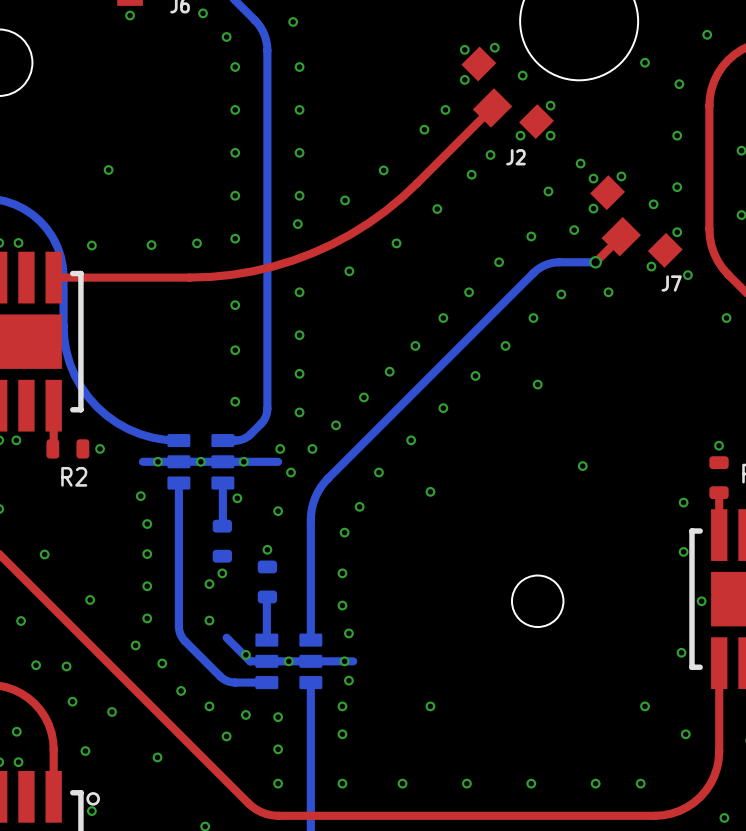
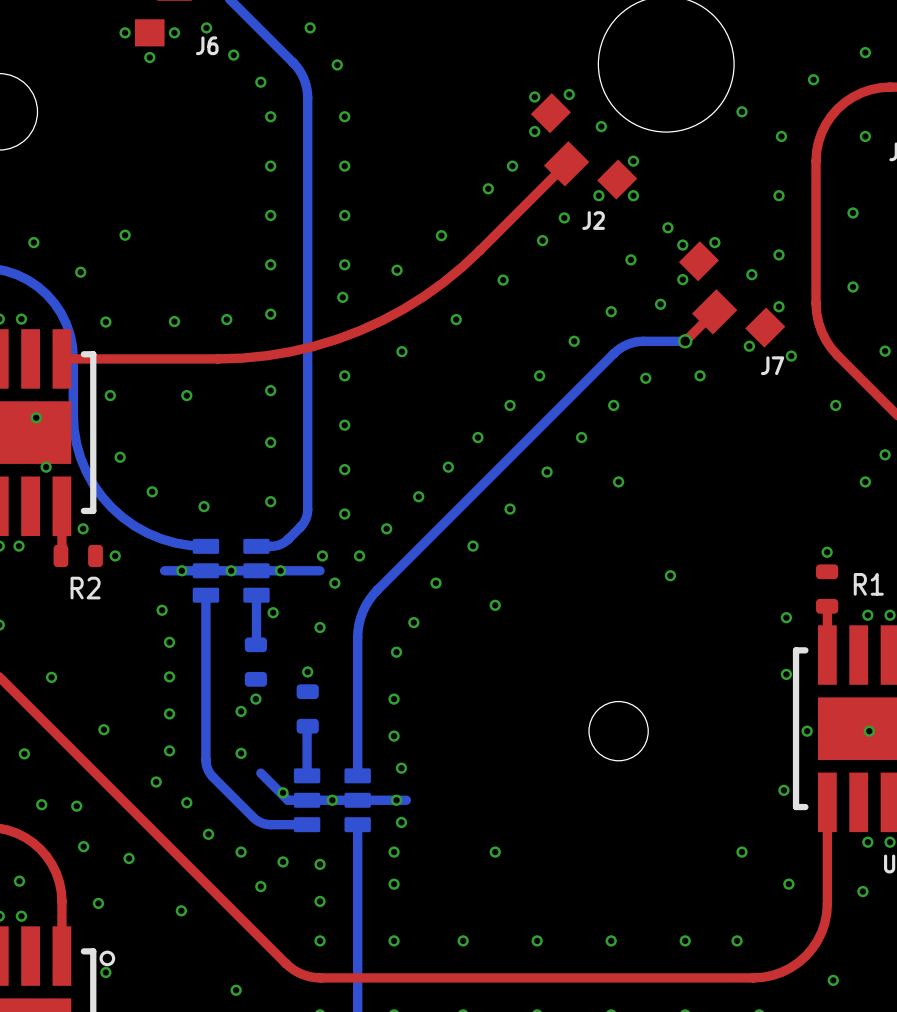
via: none -> (33, 242)
via: none -> (80, 272)
via: none -> (110, 395)
via: none -> (186, 395)
via: none -> (36, 417)
via: none -> (120, 457)
via: none -> (46, 467)
via: none -> (152, 491)
via: none -> (204, 506)
via: none -> (83, 528)

